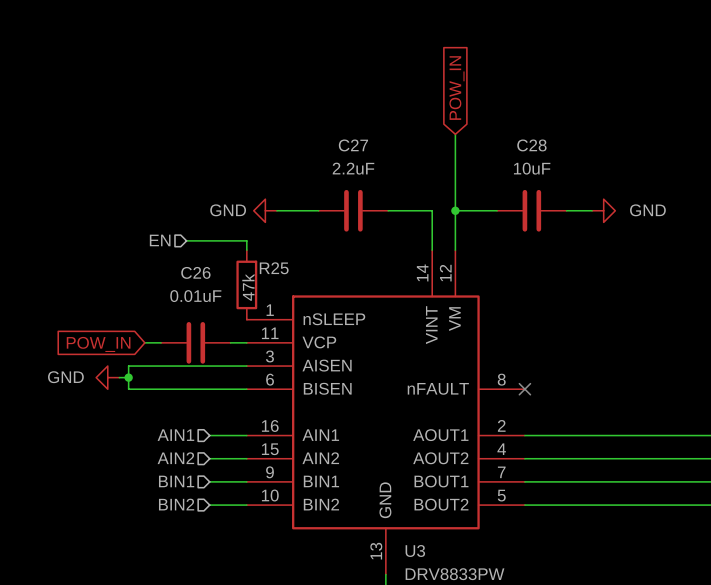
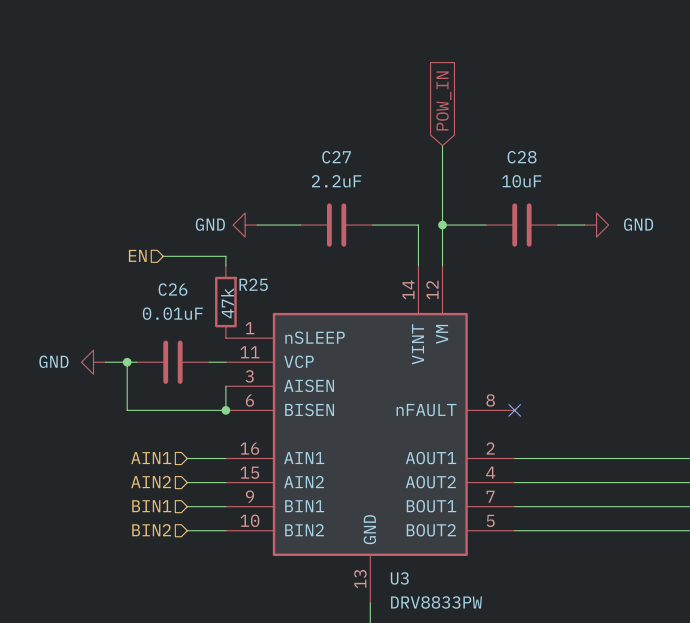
wire: none -> (105, 362) (119, 362)
wire: none -> (127, 362) (127, 410)
global label: POW_IN (98, 344) -> none
wire: (246, 366) (128, 366) (128, 389) (151, 389) -> (225, 386) (225, 410)
power symbol position: GND (107, 377) -> GND (93, 362)
wire: (119, 377) (128, 377) -> none
junction position: (128, 377) -> (127, 362)
junction: none -> (225, 410)

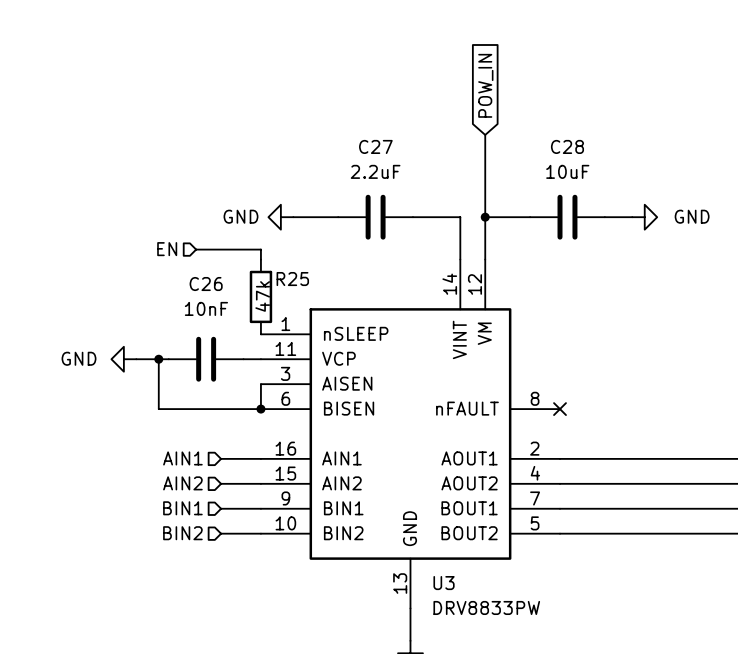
C26 value: 0.01uF (172, 313) -> 10nF (206, 308)

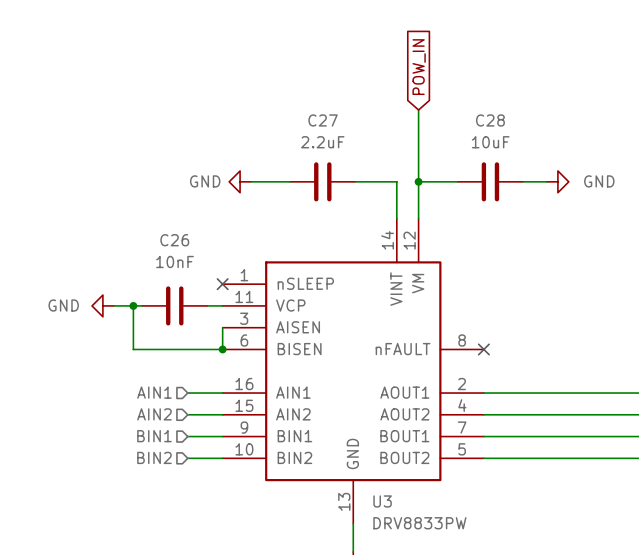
hierarchical label: EN (167, 249) -> none
wire: (196, 249) (260, 249) (260, 259) -> none
R25: 47k (260, 296) -> none
no-connect mark: none -> (222, 284)

